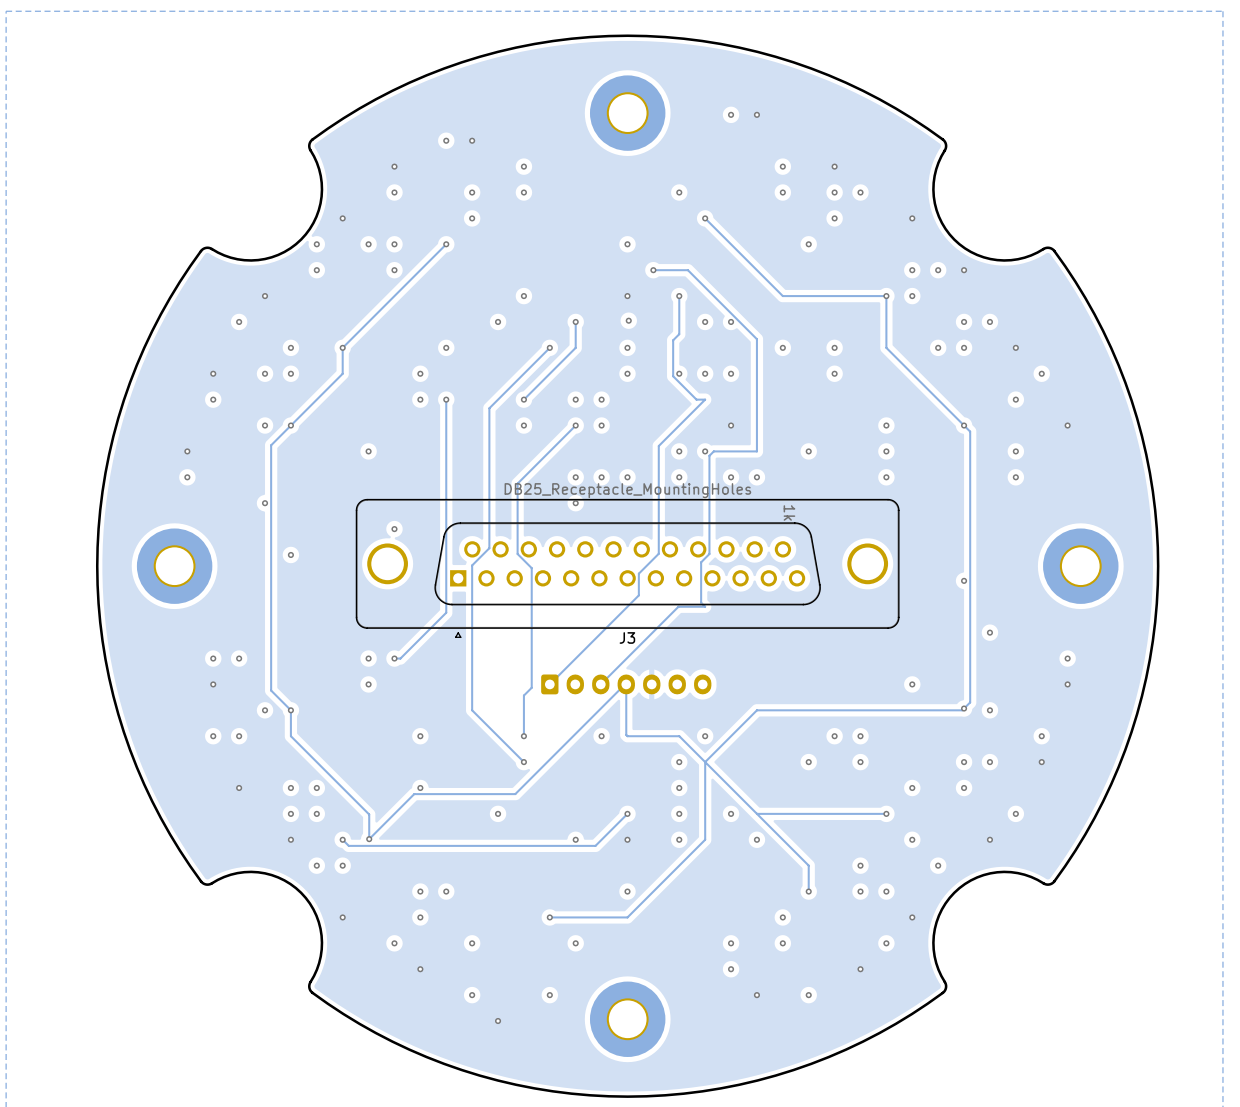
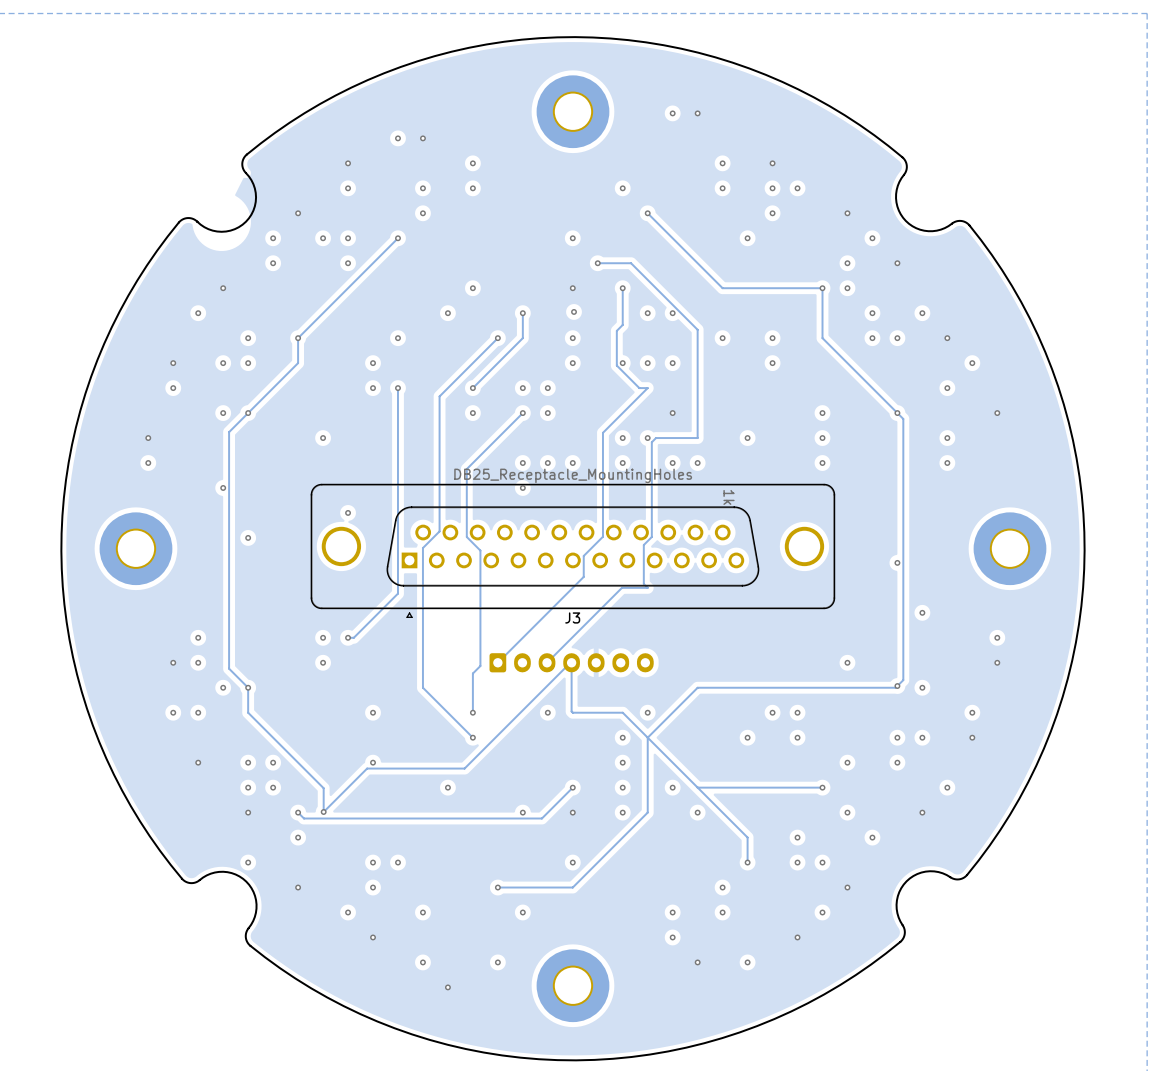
board edge: (942, 139) (945, 147) (936, 169) (933, 189) (934, 203) (941, 222) (949, 234) (964, 248) (990, 259) (1017, 259) (1047, 247) (1054, 251) (1094, 314) (1118, 365) (1137, 418) (1152, 491) (1156, 528) (1157, 584) (1152, 640) (1141, 696) (1125, 749) (1103, 801) (1085, 834) (1054, 881) (1046, 884) (1024, 874) (1004, 871) (983, 875) (970, 880) (954, 892) (945, 903) (934, 928) (934, 956) (946, 985) (942, 992) (879, 1033) (828, 1057) (757, 1080) (702, 1091) (646, 1096) (590, 1095) (534, 1088) (497, 1080) (461, 1070) (409, 1049) (359, 1023) (312, 992) (309, 984) (319, 963) (321, 942) (318, 922) (313, 909) (305, 897) (290, 884) (265, 873) (237, 873) (208, 884) (201, 881) (170, 834) (136, 767) (118, 714) (102, 640) (97, 584) (98, 528) (105, 472) (113, 436) (130, 382) (152, 330) (179, 281) (201, 251) (209, 247) (230, 257) (251, 260) (271, 257) (284, 251) (305, 234) (313, 222) (320, 203) (320, 175) (309, 146) (312, 139) (359, 108) (426, 75) (479, 56) (552, 41) (590, 37) (646, 36) (702, 41) (757, 51) (793, 62) (845, 82) (895, 108) (942, 139) -> none
board edge: none -> (245, 173) (242, 165) (245, 155) (289, 122) (351, 87) (400, 67) (451, 51) (504, 41) (557, 37) (610, 38) (663, 45) (715, 57) (765, 74) (814, 97) (859, 125) (904, 159) (906, 168) (897, 185) (896, 198) (900, 214) (909, 223) (916, 228) (928, 231) (940, 229) (957, 221) (964, 221) (969, 225) (991, 254) (1021, 302) (1045, 352) (1063, 404) (1076, 458) (1081, 495) (1084, 550) (1081, 606) (1072, 660) (1057, 714) (1036, 765) (1019, 798) (989, 845) (964, 877) (956, 879) (938, 872) (925, 871) (913, 876) (903, 884) (897, 896) (896, 904) (898, 917) (904, 930) (901, 940) (871, 964) (824, 994) (774, 1019) (722, 1038) (686, 1047) (631, 1056) (576, 1060) (520, 1057) (465, 1048) (412, 1034) (360, 1014) (327, 997) (279, 968) (248, 943) (246, 933) (254, 917) (256, 904) (253, 892) (243, 878) (231, 873) (223, 871) (210, 873) (193, 883) (182, 879) (159, 850) (130, 806) (106, 758) (92, 725) (77, 674) (69, 639) (62, 586) (61, 533) (65, 480) (75, 427) (85, 393) (104, 343) (128, 295) (167, 236) (182, 219) (190, 218) (197, 221)
board edge: none -> (245, 173) (253, 184) (256, 197) (253, 210) (245, 221) (234, 229) (221, 231) (208, 229) (197, 221)
via: none -> (872, 238)
via: (938, 270) -> none
via: none -> (872, 313)
via: (964, 321) -> none
via position: (213, 658) -> (198, 662)
via position: (316, 865) -> (248, 862)

